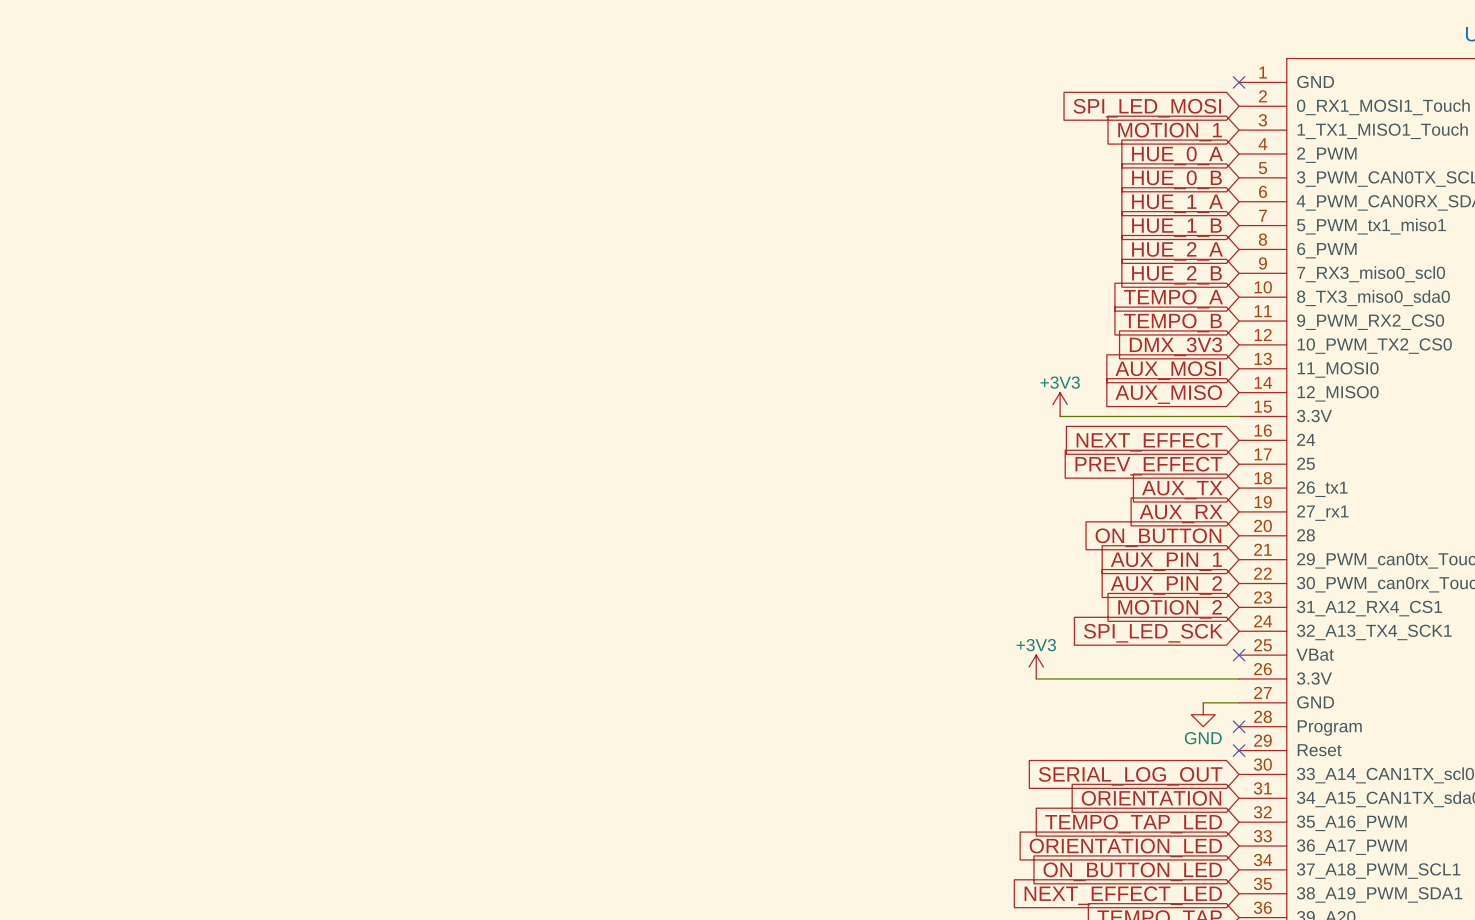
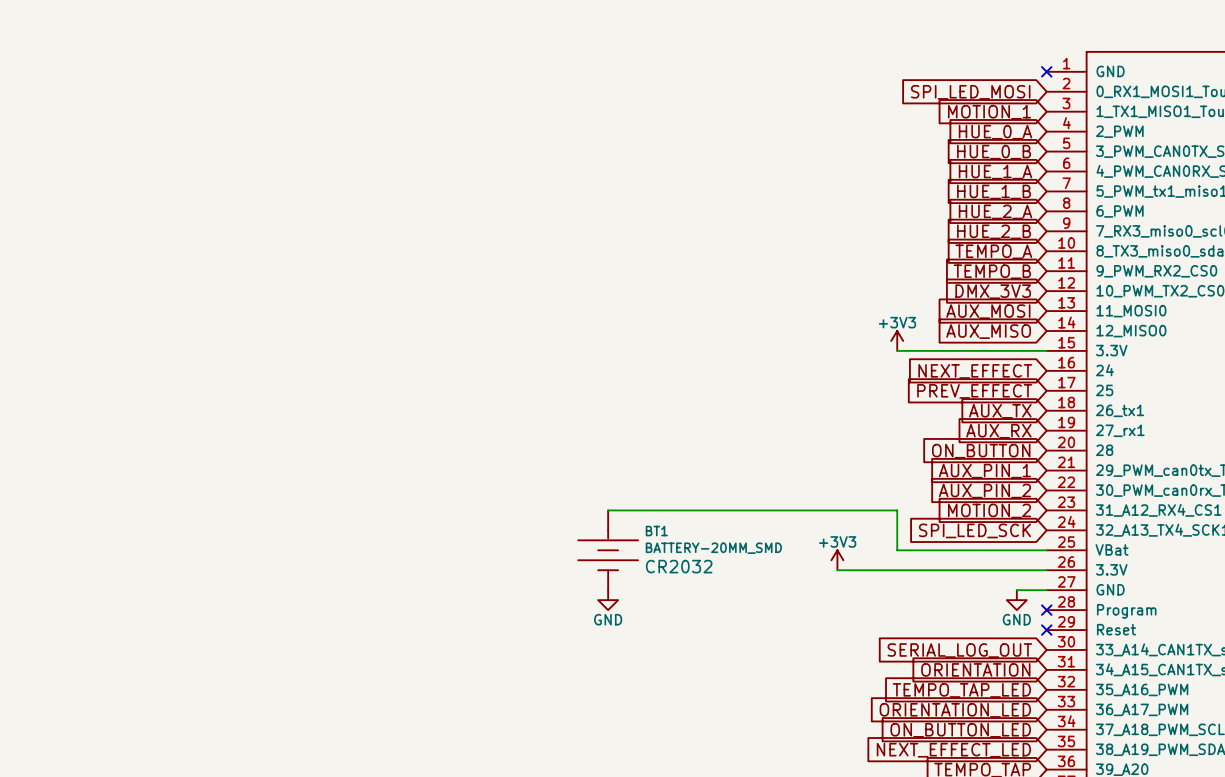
wire: none -> (608, 510) (897, 510) (897, 550) (1046, 550)
BT1: none -> BATTERY-20MM_SMD (608, 550)
no-connect mark: (1239, 655) -> none
power symbol position: +3V3 (1036, 667) -> +3V3 (837, 560)
wire: none -> (837, 570) (877, 570)
power symbol: none -> GND (608, 600)

